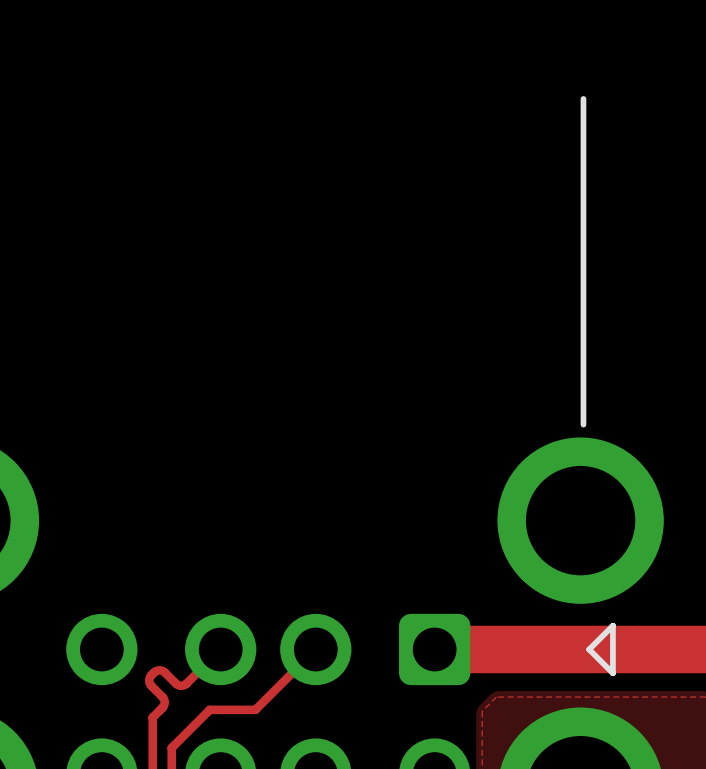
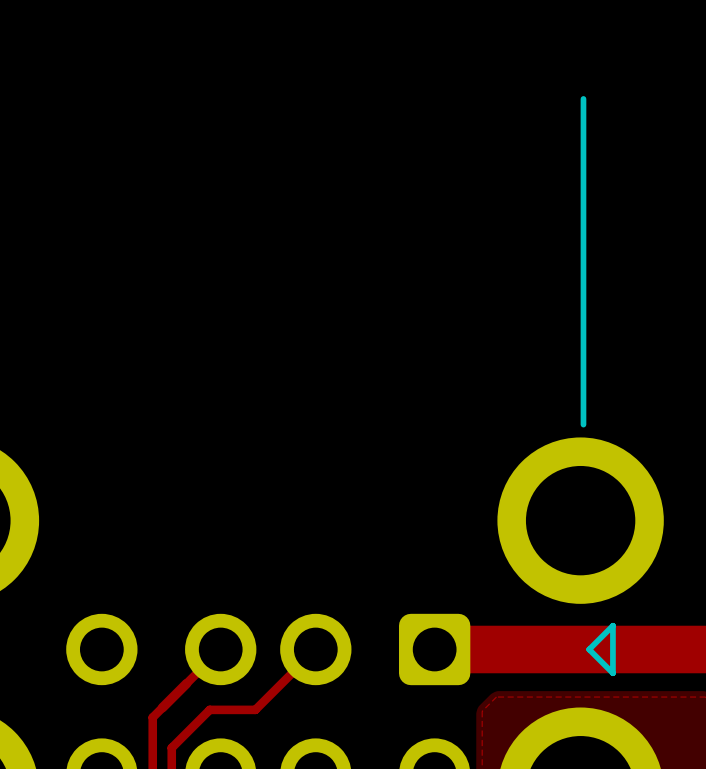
track: (186, 683) (178, 685) (162, 671) (154, 672) (150, 677) (149, 682) (163, 699) (162, 707) -> (186, 683) (162, 707)

